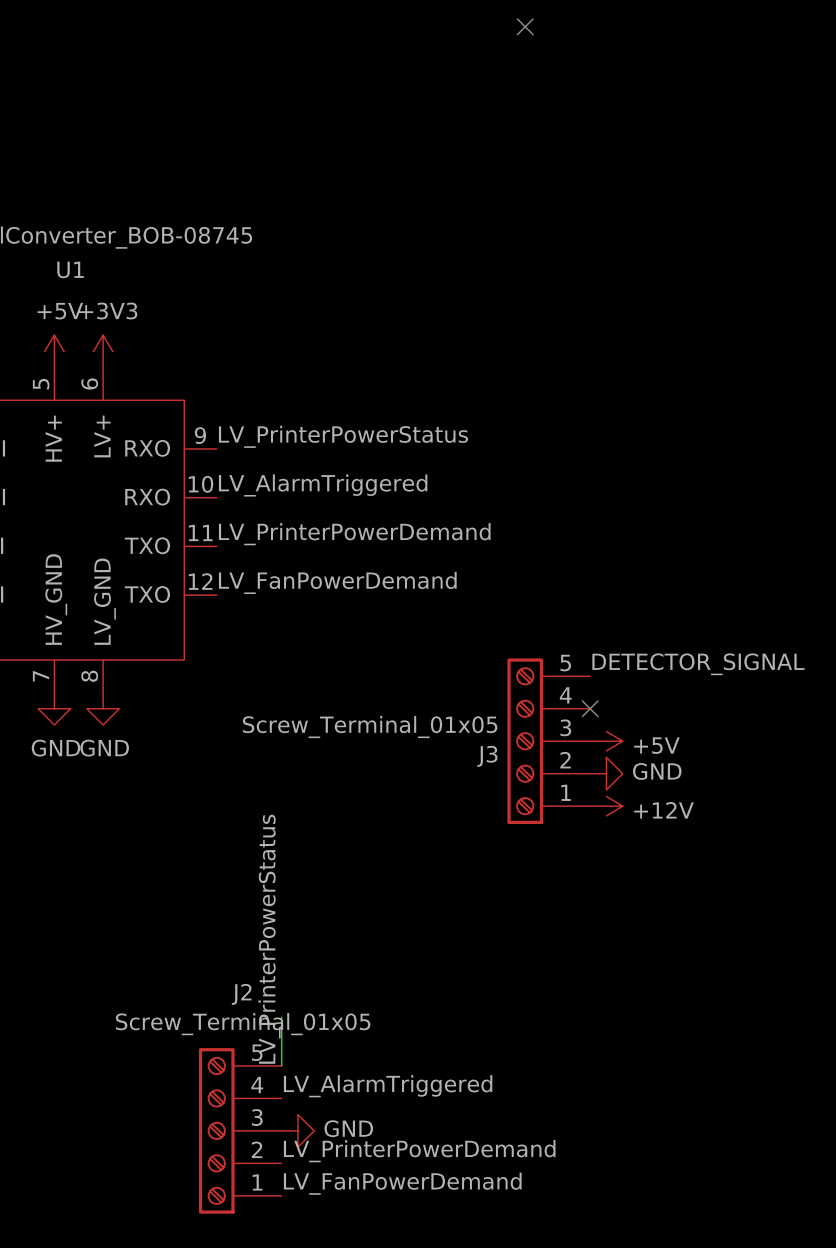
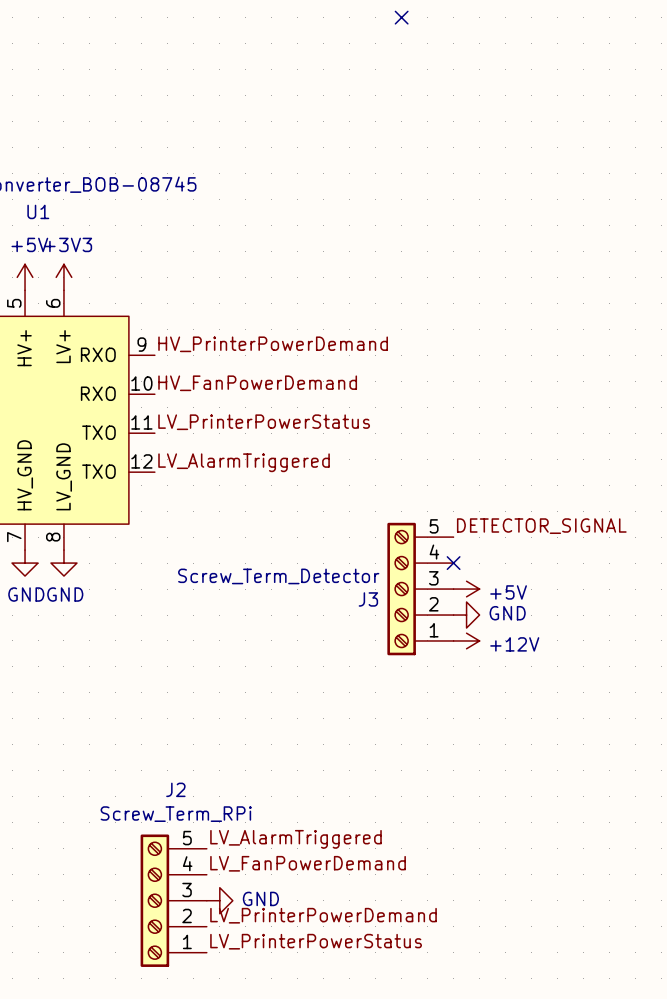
label: LV_PrinterPowerStatus (343, 436) -> HV_PrinterPowerDemand (273, 344)
label: LV_AlarmTriggered (323, 485) -> HV_FanPowerDemand (257, 383)
label: LV_PrinterPowerDemand (354, 534) -> LV_PrinterPowerStatus (264, 422)
label: LV_FanPowerDemand (337, 582) -> LV_AlarmTriggered (244, 462)
J3 value: Screw_Terminal_01x05 (370, 726) -> Screw_Term_Detector (278, 576)
label: LV_PrinterPowerStatus (269, 939) -> LV_AlarmTriggered (295, 839)
wire: (281, 1017) (281, 1065) -> none
J2 value: Screw_Terminal_01x05 (243, 1024) -> Screw_Term_RPi (176, 814)
label: LV_AlarmTriggered (388, 1086) -> LV_FanPowerDemand (308, 863)
label: LV_FanPowerDemand (402, 1183) -> LV_PrinterPowerStatus (316, 941)

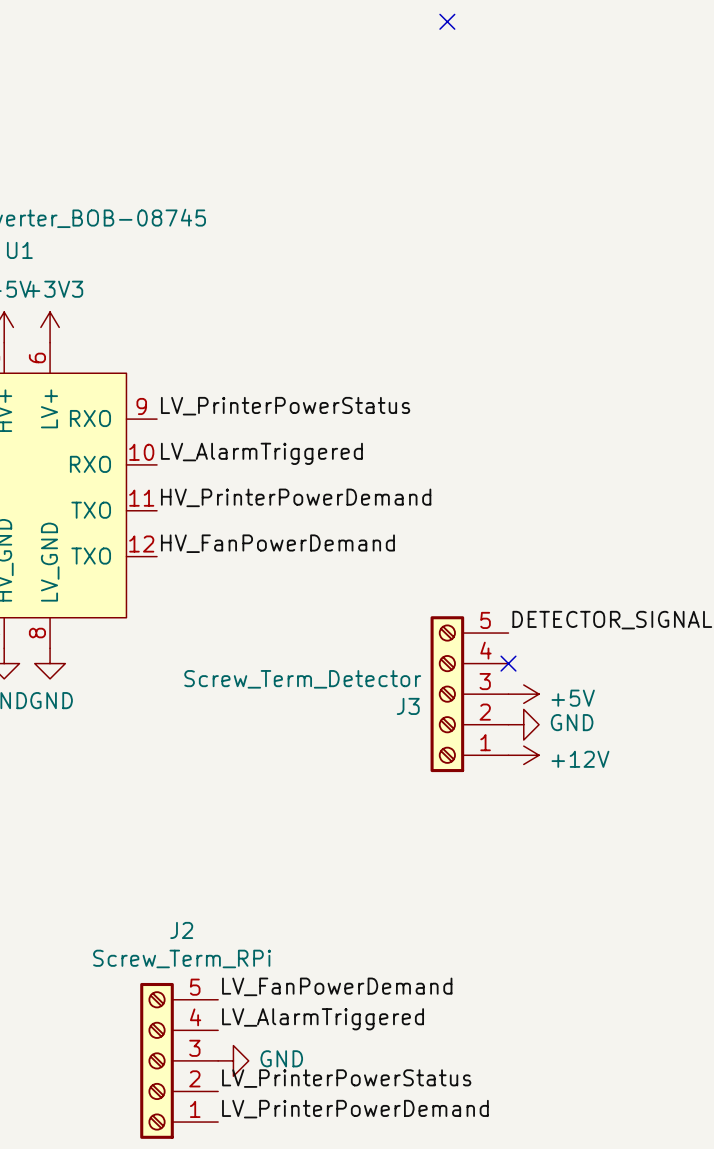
label: HV_PrinterPowerDemand (273, 344) -> LV_PrinterPowerStatus (285, 406)
label: HV_FanPowerDemand (257, 383) -> LV_AlarmTriggered (261, 453)
label: LV_PrinterPowerStatus (264, 422) -> HV_PrinterPowerDemand (296, 497)
label: LV_AlarmTriggered (244, 462) -> HV_FanPowerDemand (277, 543)
label: LV_AlarmTriggered (295, 839) -> LV_FanPowerDemand (337, 986)
label: LV_FanPowerDemand (308, 863) -> LV_AlarmTriggered (323, 1019)
label: LV_PrinterPowerDemand (323, 915) -> LV_PrinterPowerStatus (346, 1078)
label: LV_PrinterPowerStatus (316, 941) -> LV_PrinterPowerDemand (355, 1109)

